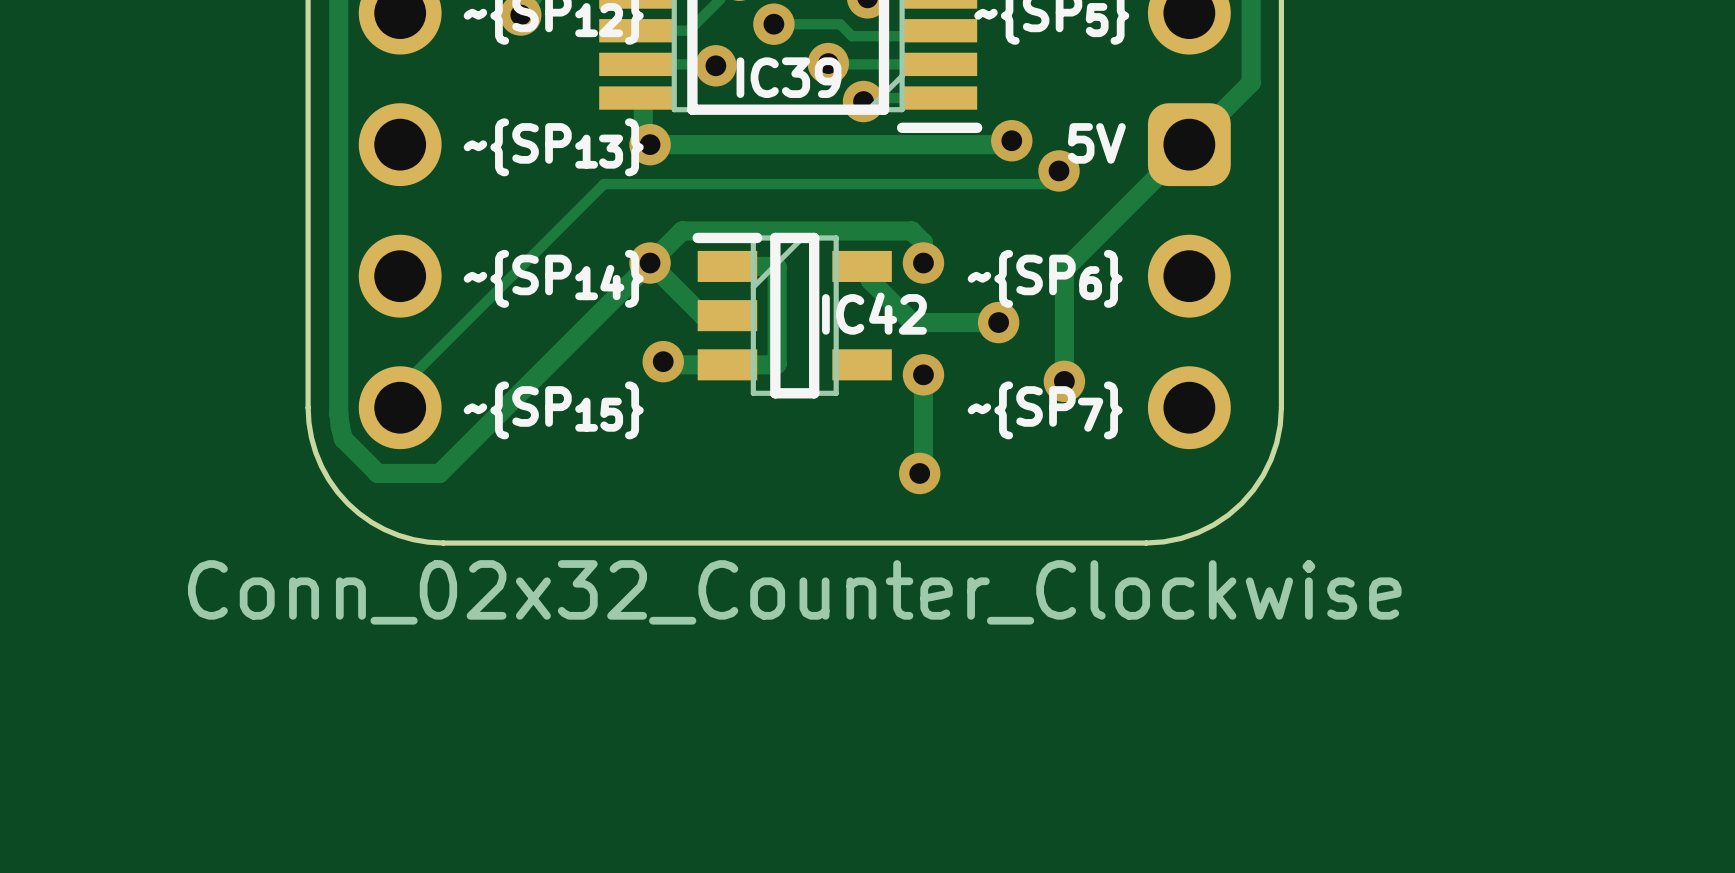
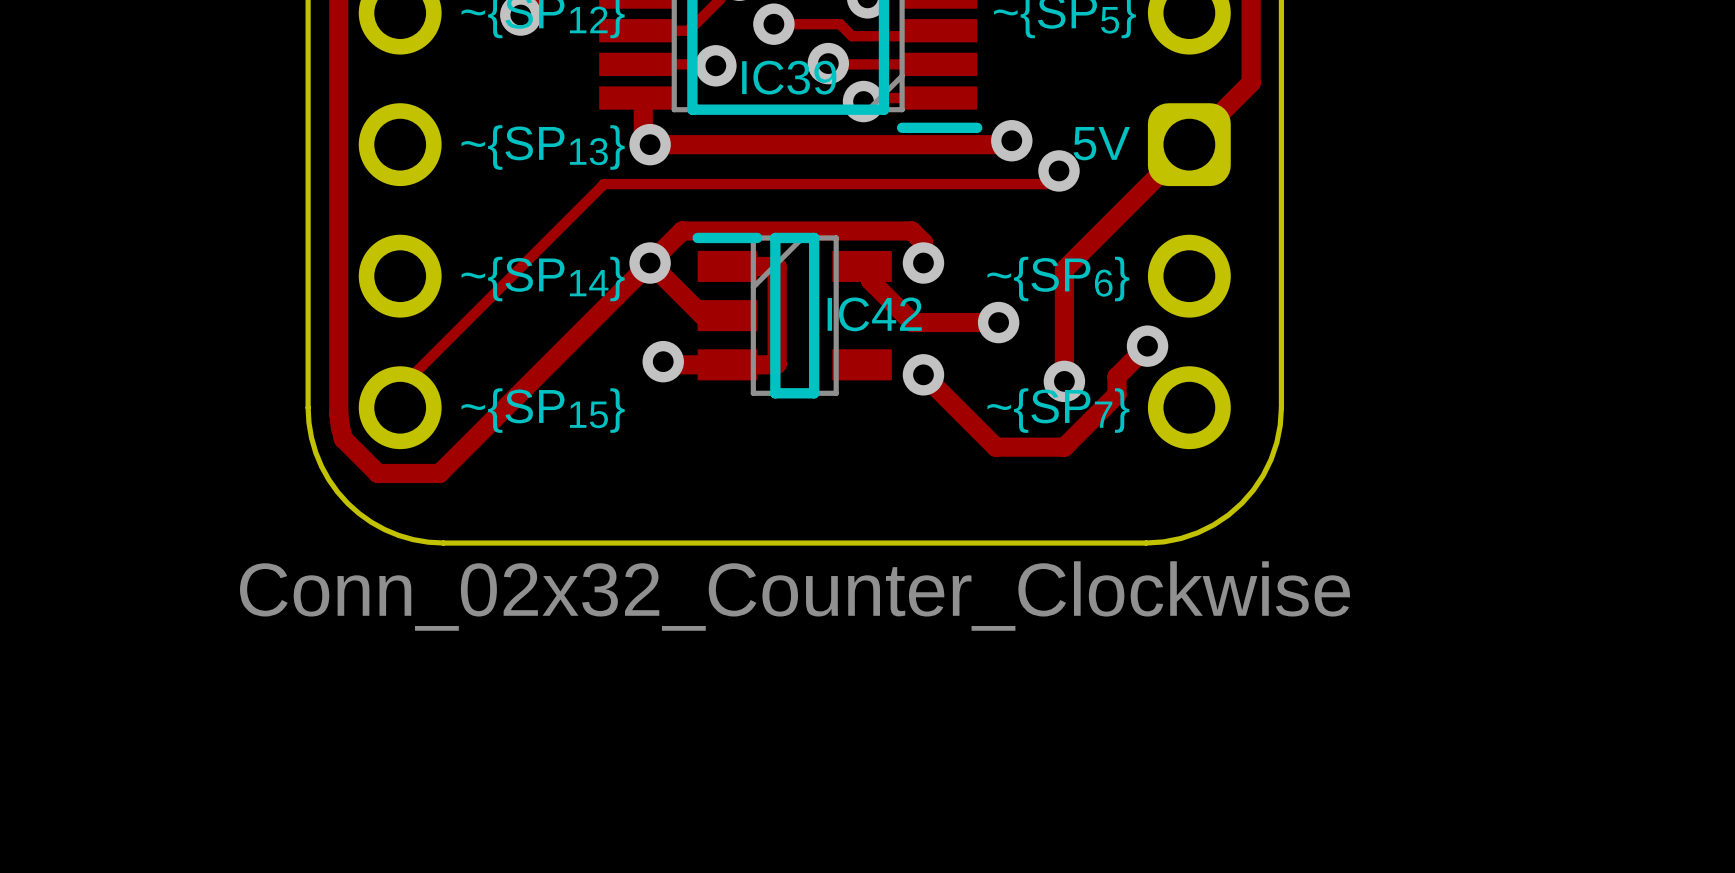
via: none -> (1147, 346)
track: (923, 374) (923, 469) (919, 473) -> (923, 374) (995, 447) (1064, 447) (1117, 394) (1117, 376) (1147, 346)
via: (919, 473) -> none

